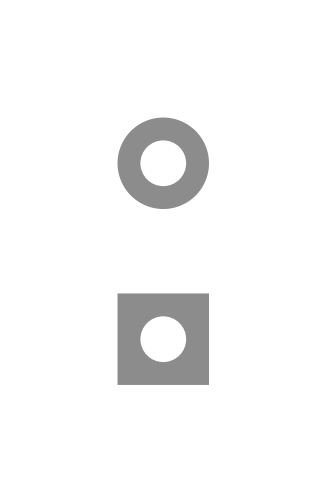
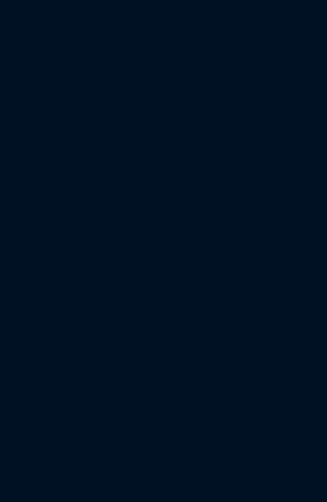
part: (163, 251) -> none

